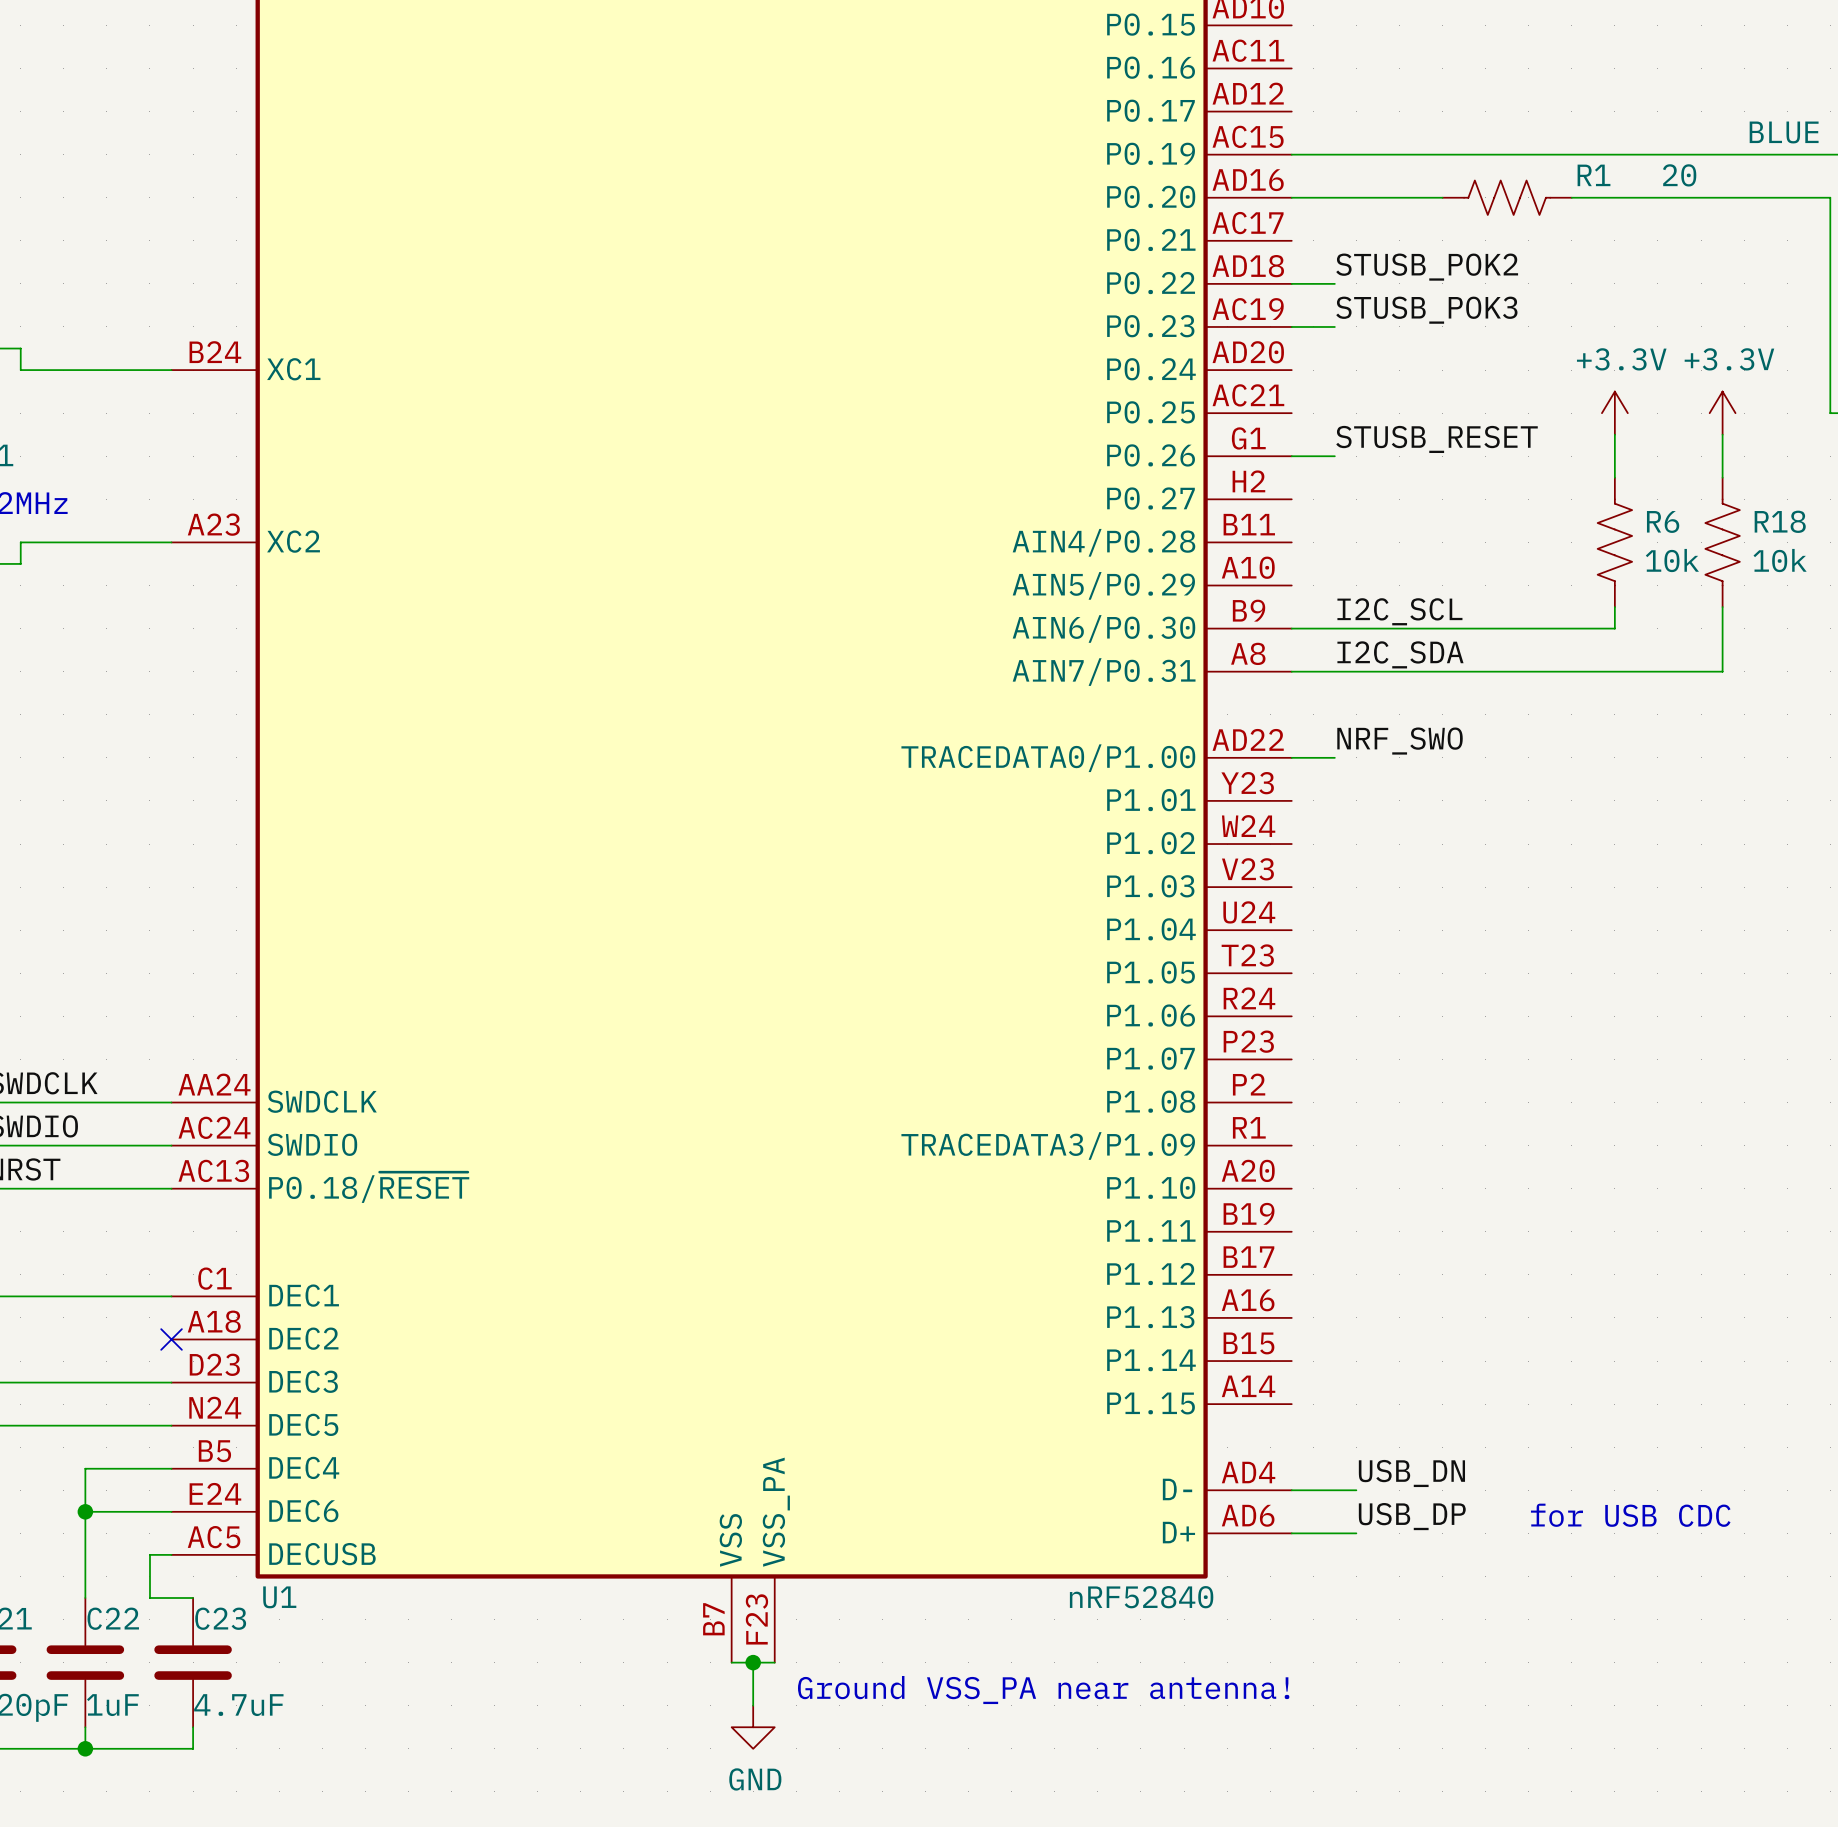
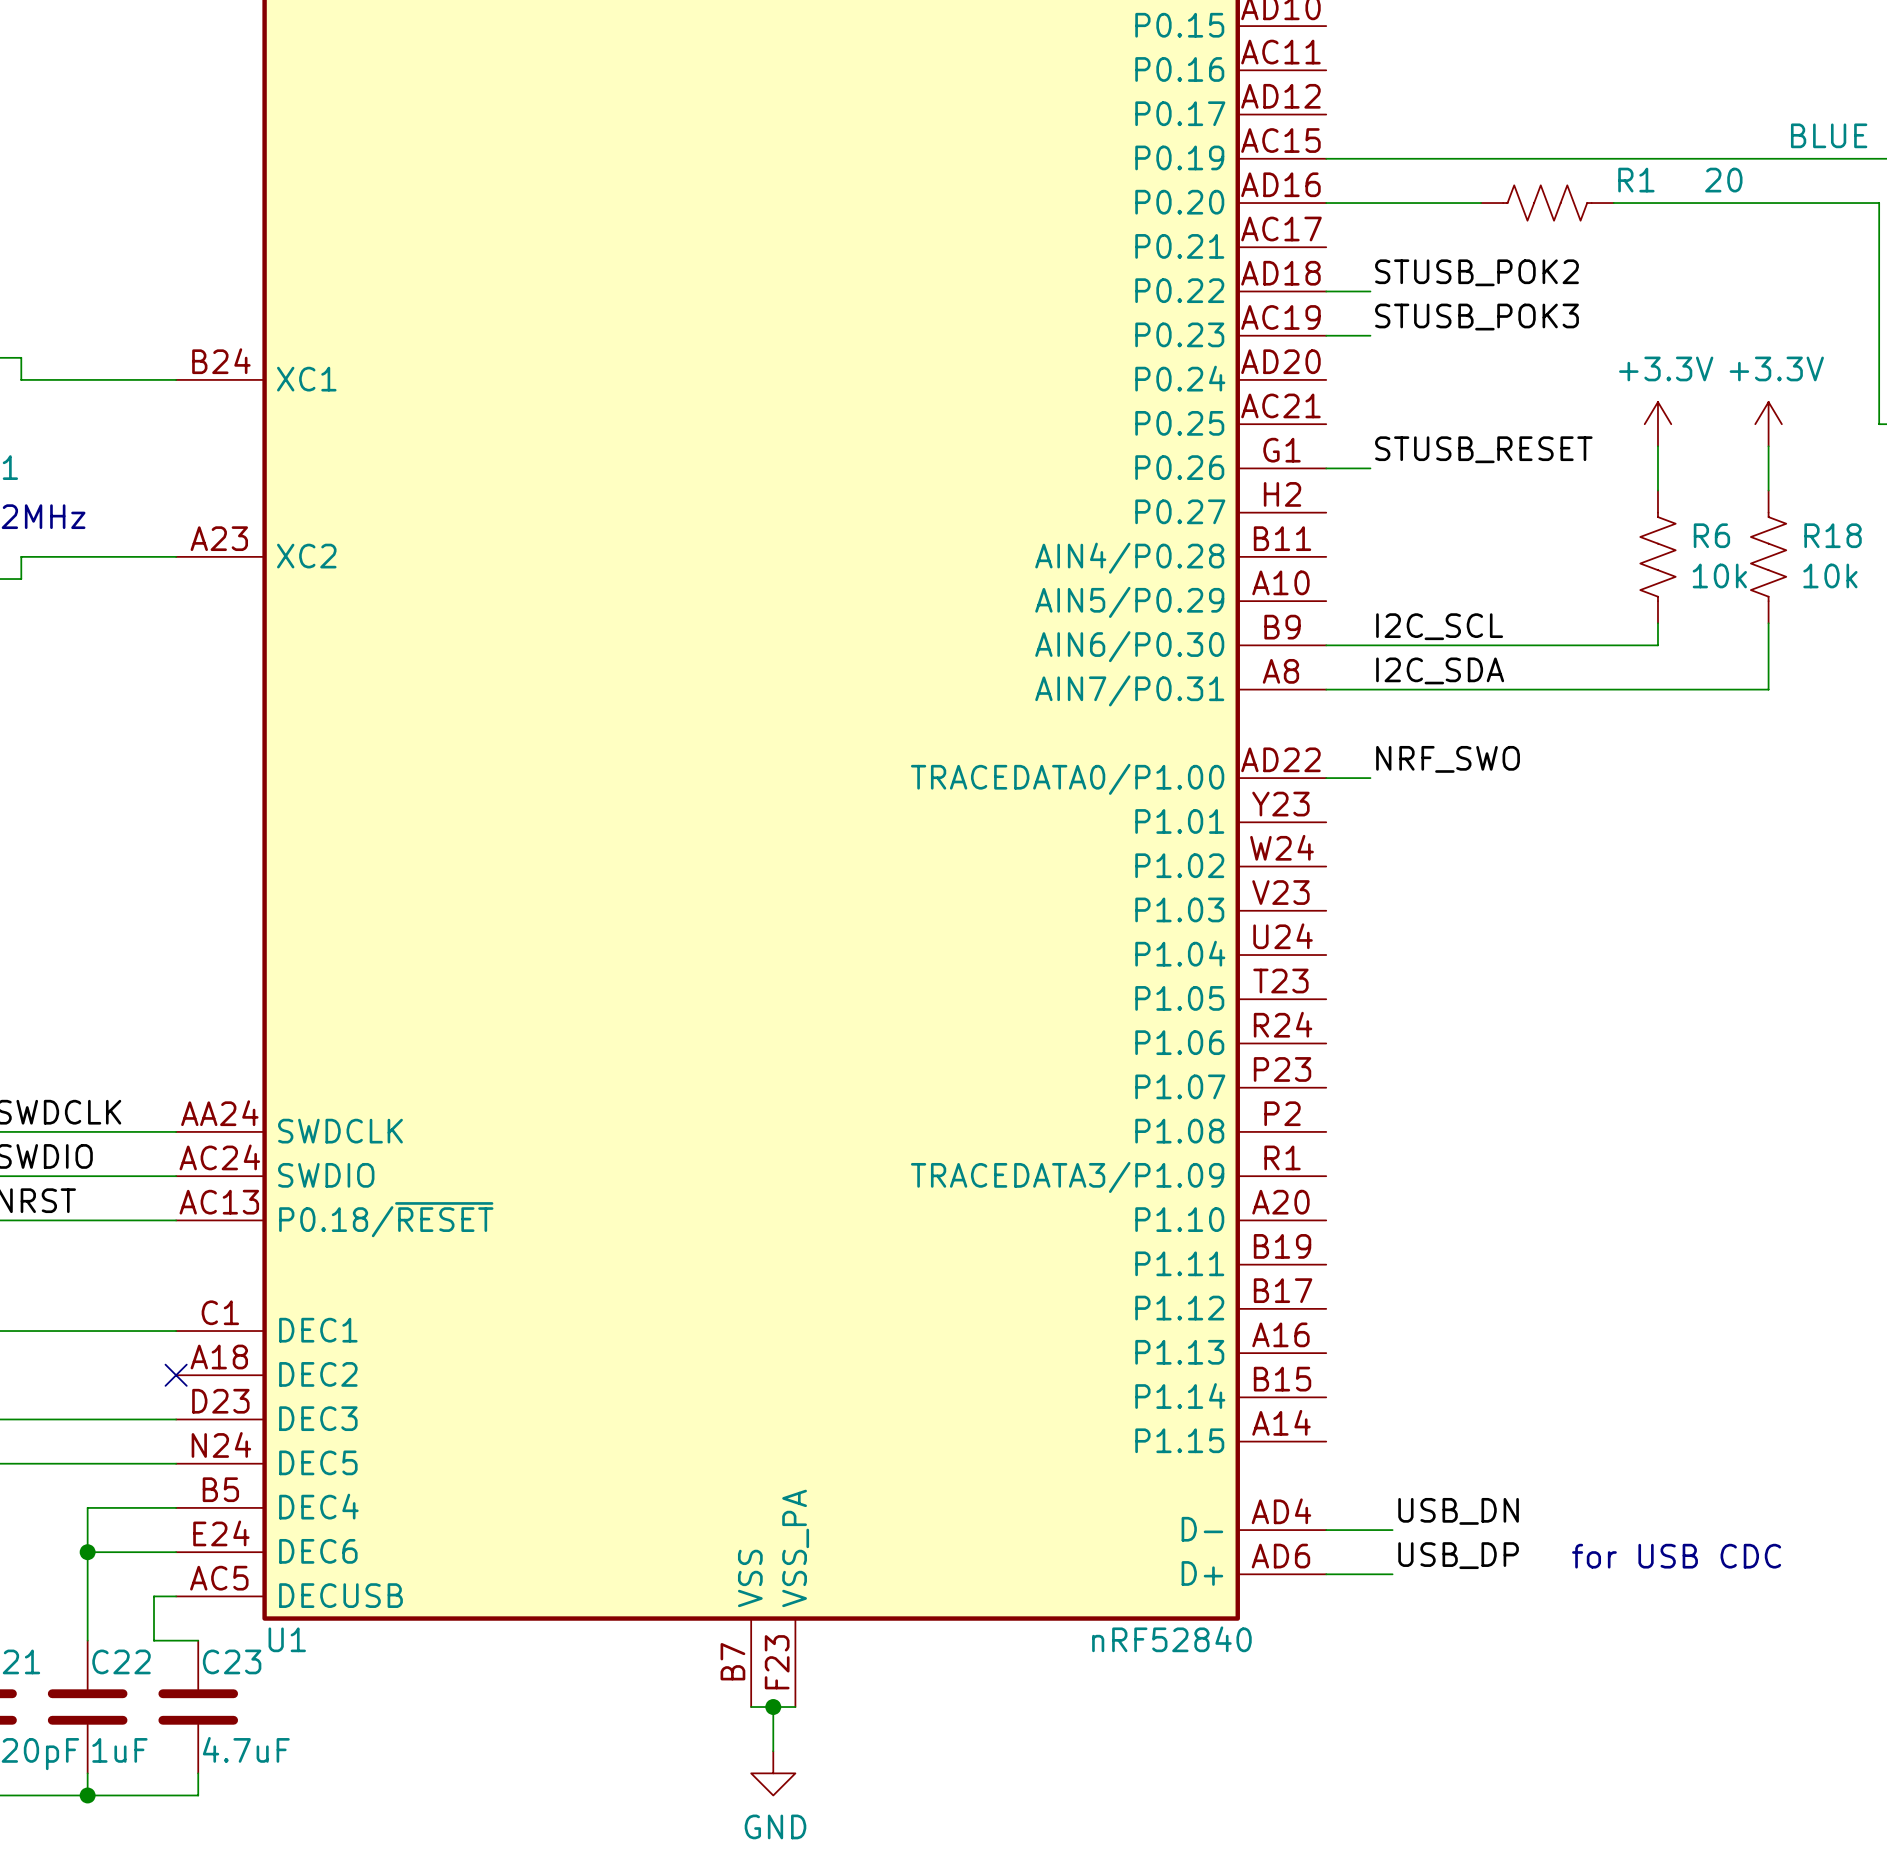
text: Ground VSS_PA near antenna! (1043, 1690) -> none

